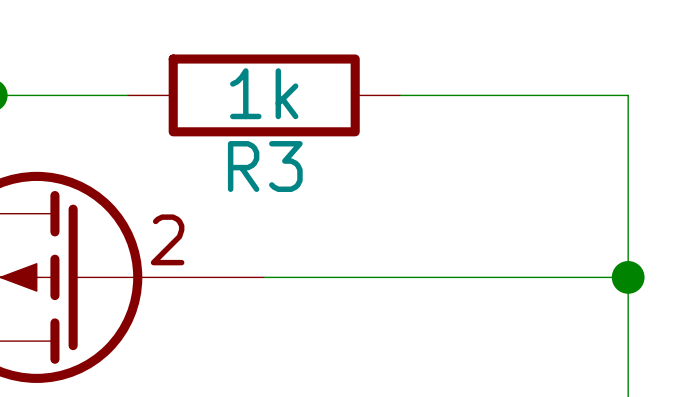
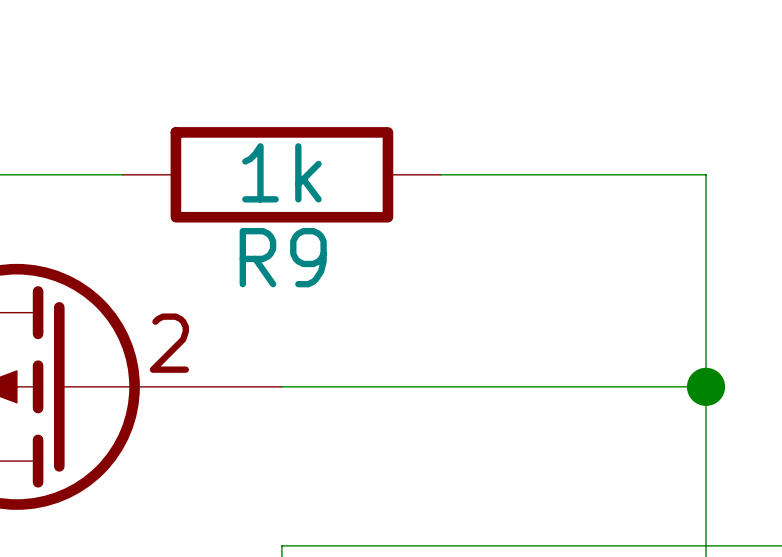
R3 name: R3 (265, 166) -> R9 (283, 257)

